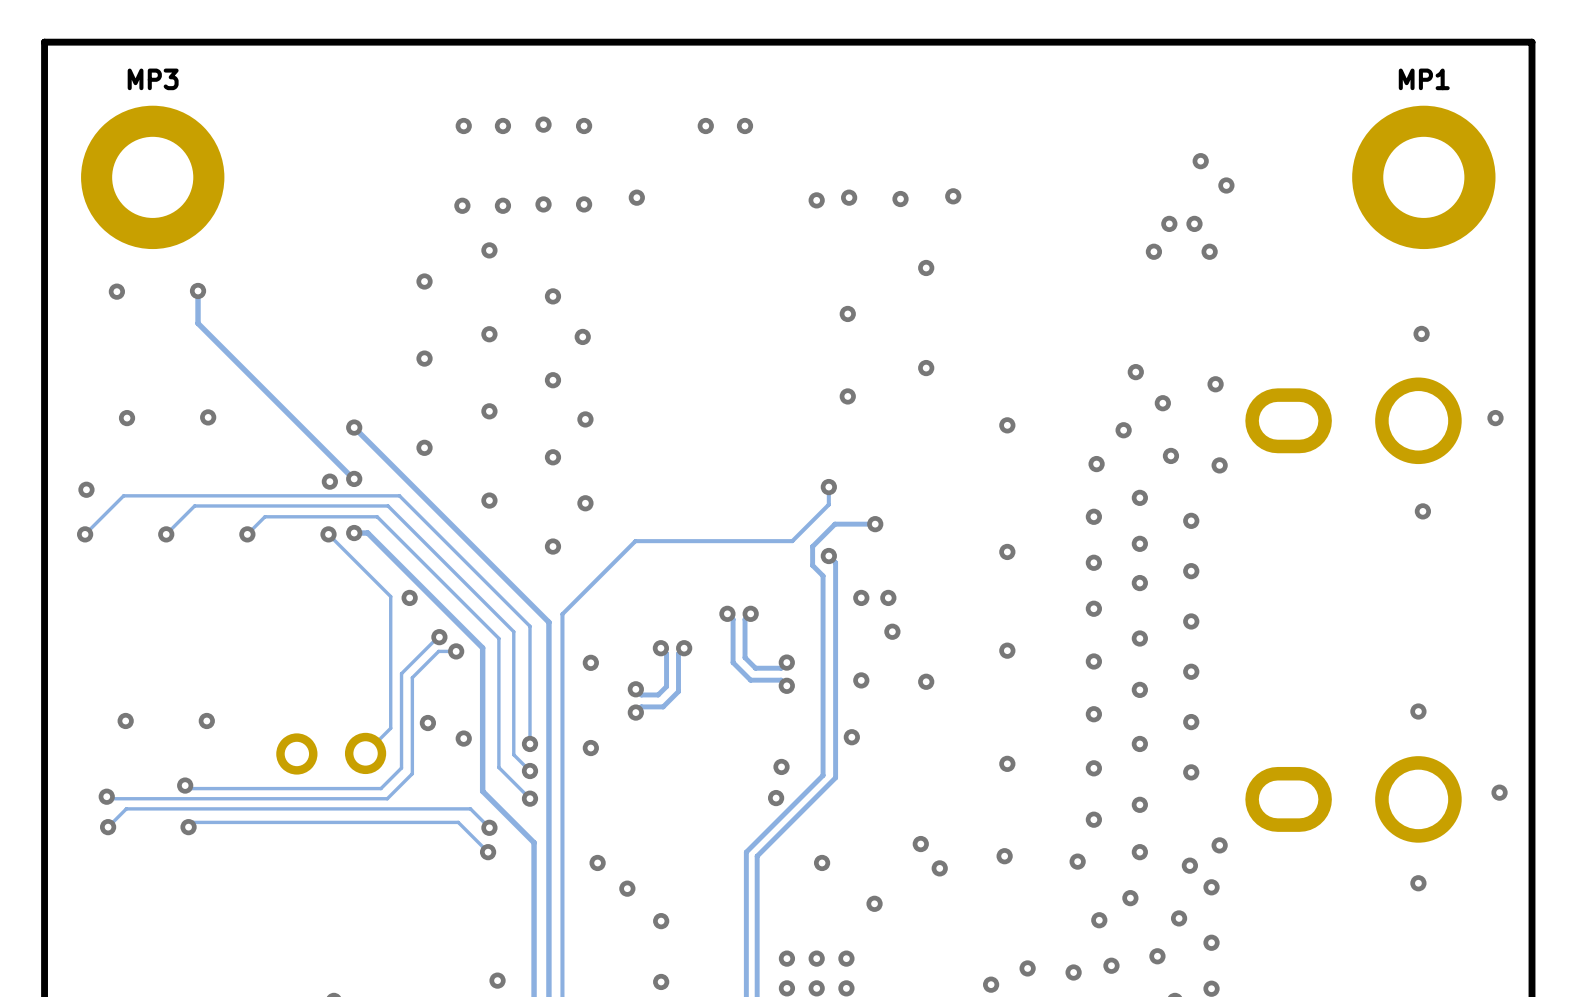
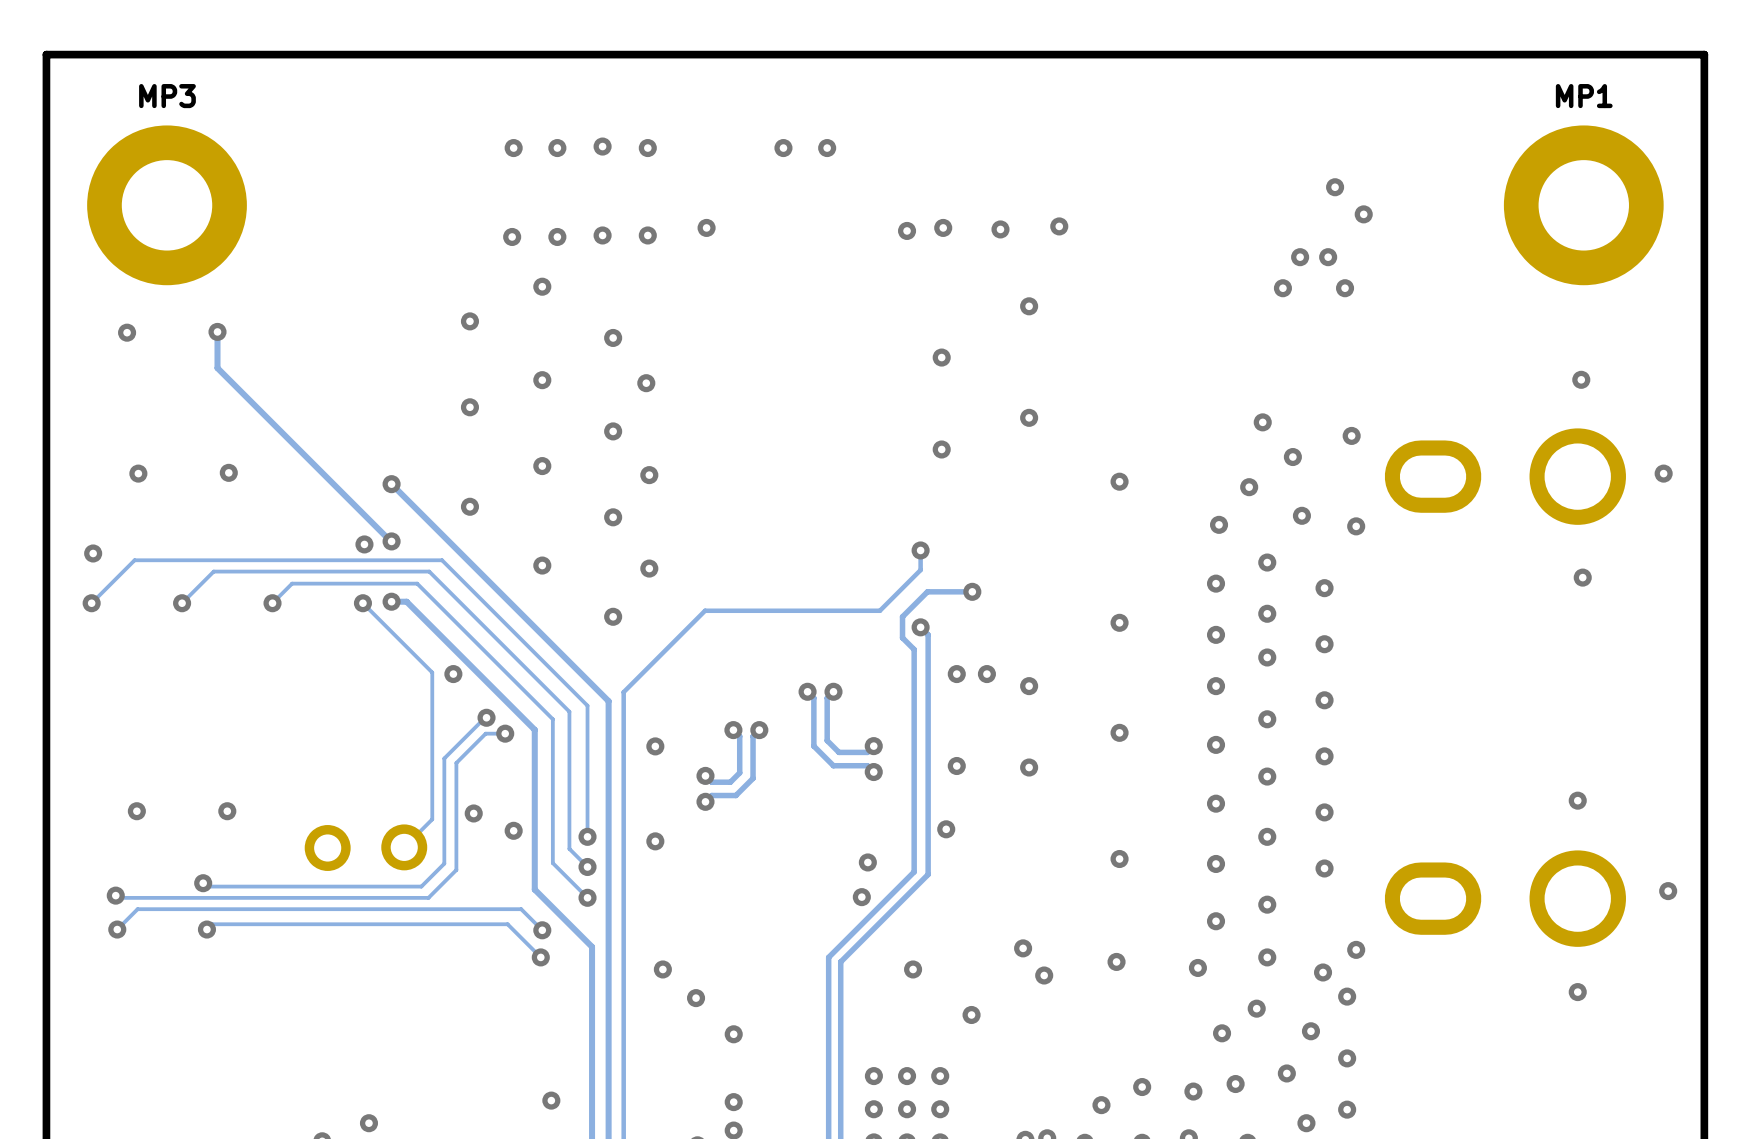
via position: (892, 631) -> (1029, 686)

